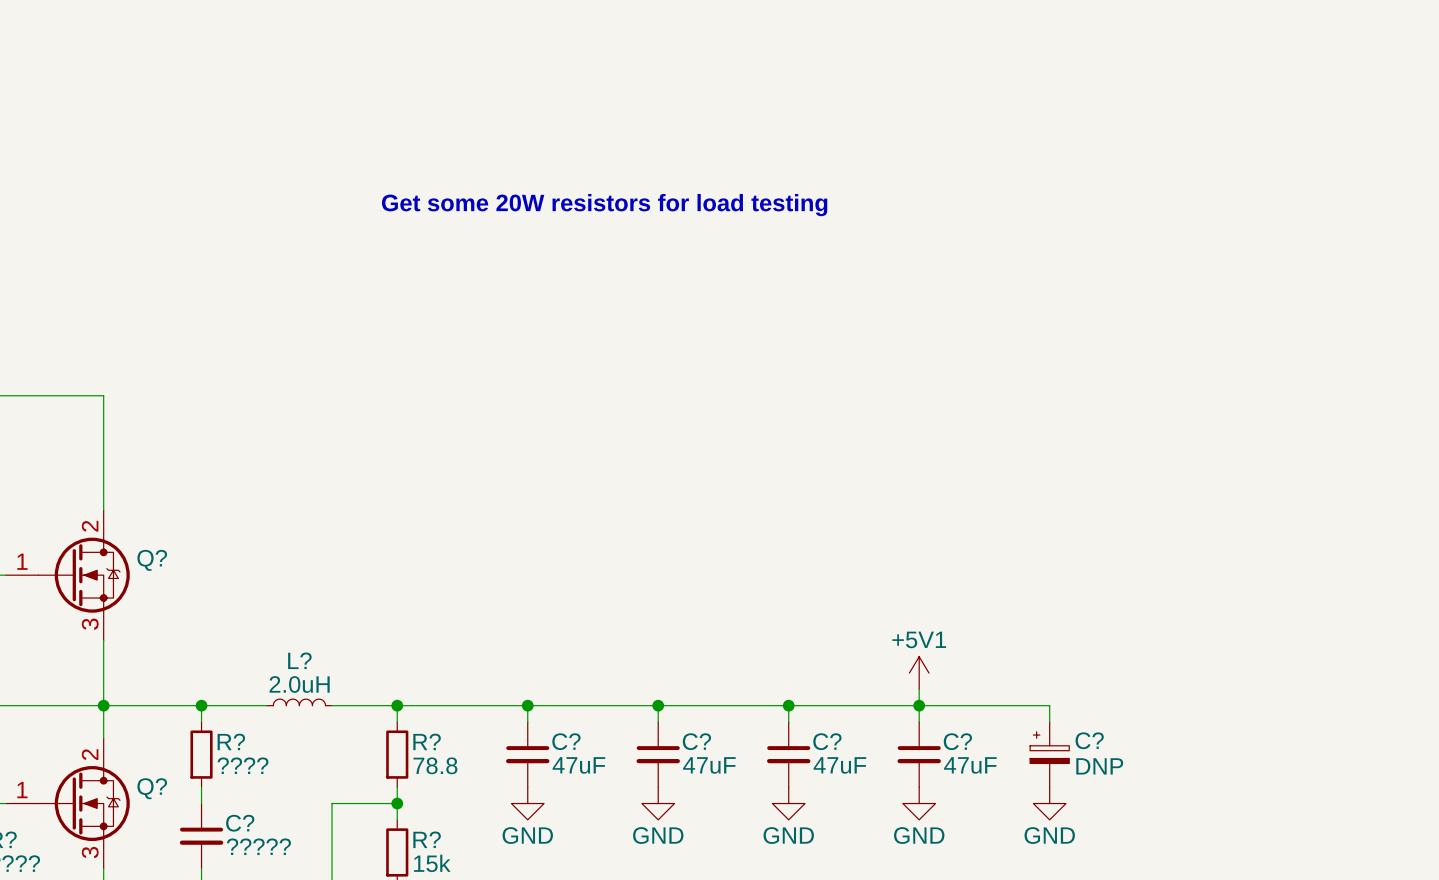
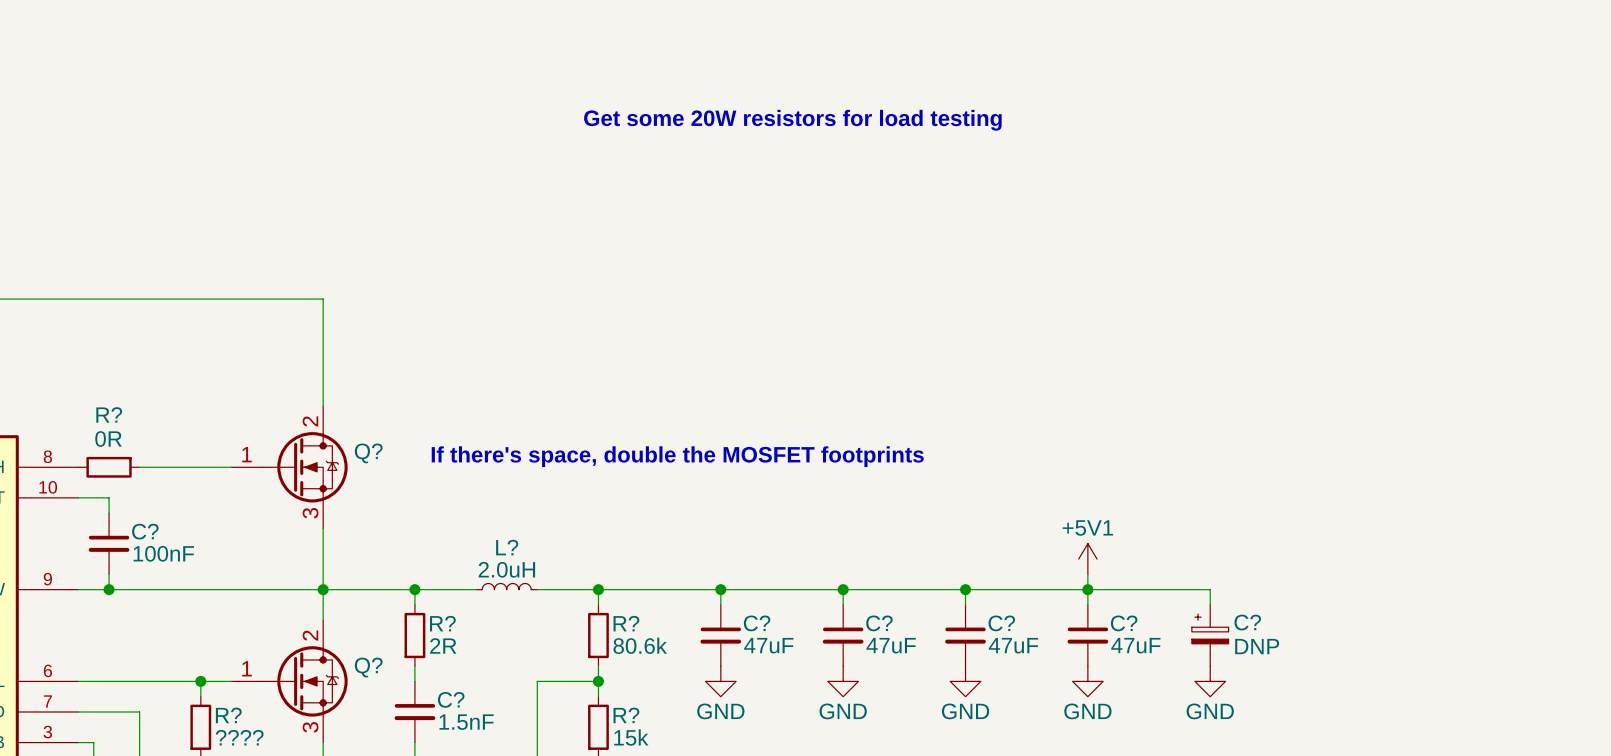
text: none -> If there's space, double the MOSFET footprints (677, 456)
R? value: ???? (242, 765) -> 2R (443, 645)
R? value: 78.8 (435, 765) -> 80.6k (640, 645)
C? value: ????? (258, 846) -> 1.5nF (466, 722)

